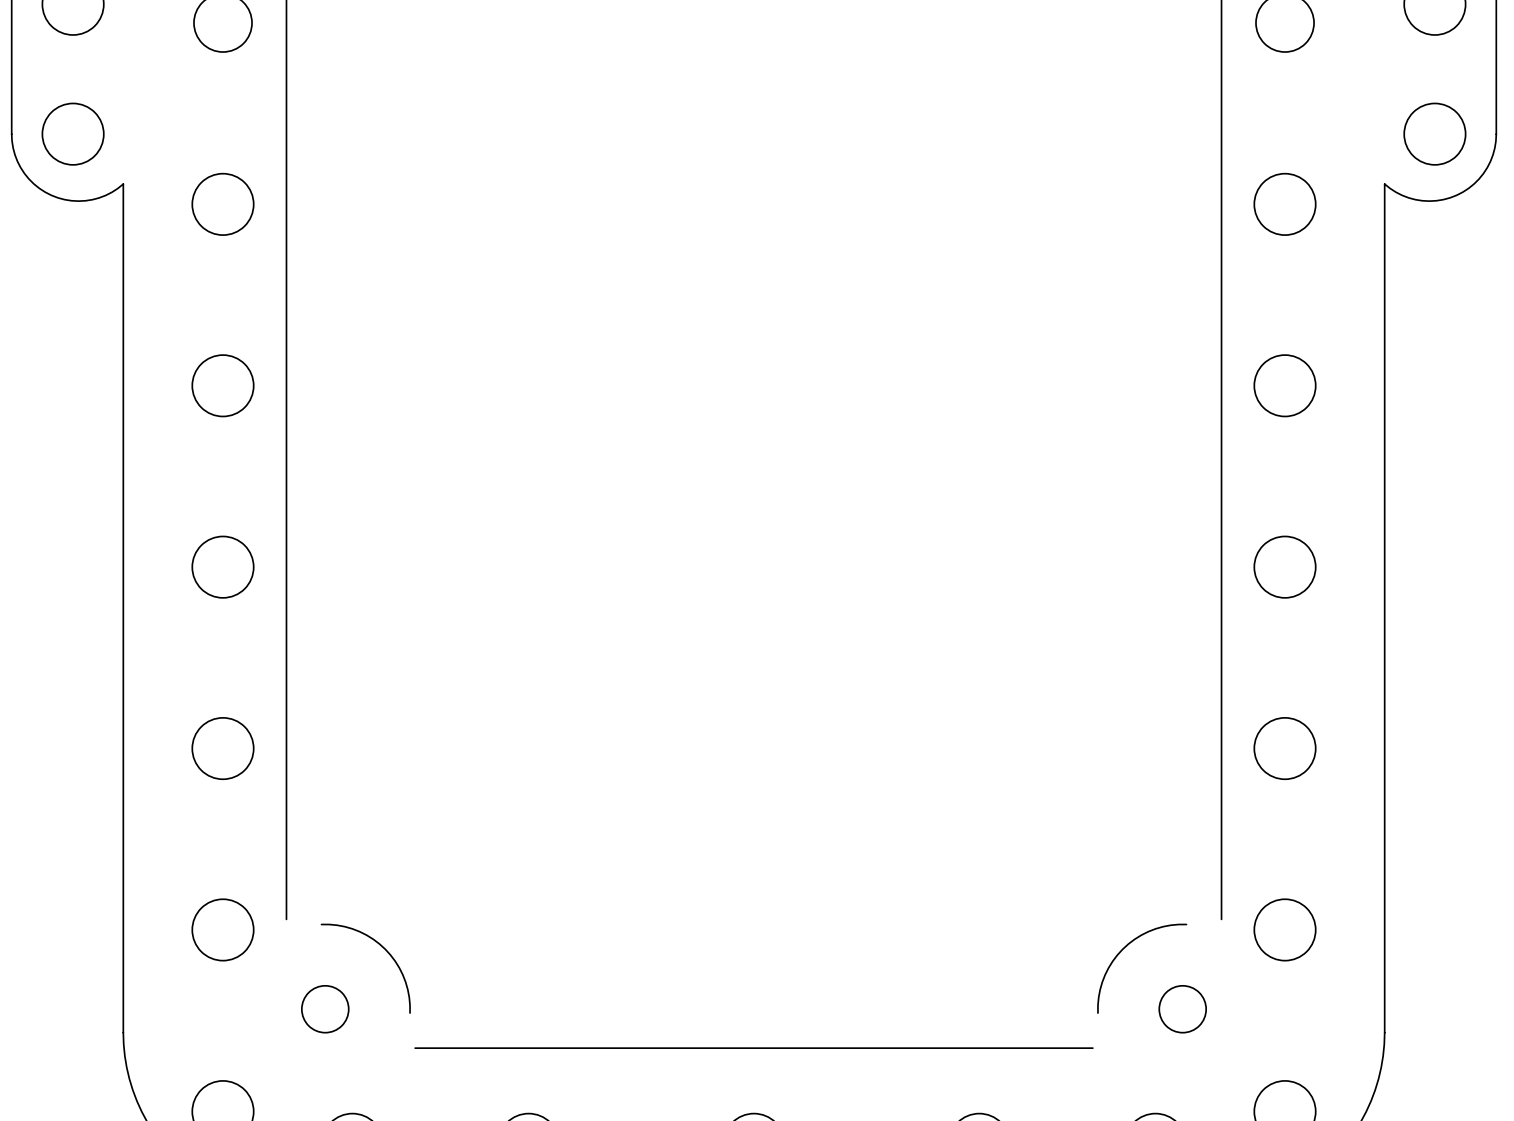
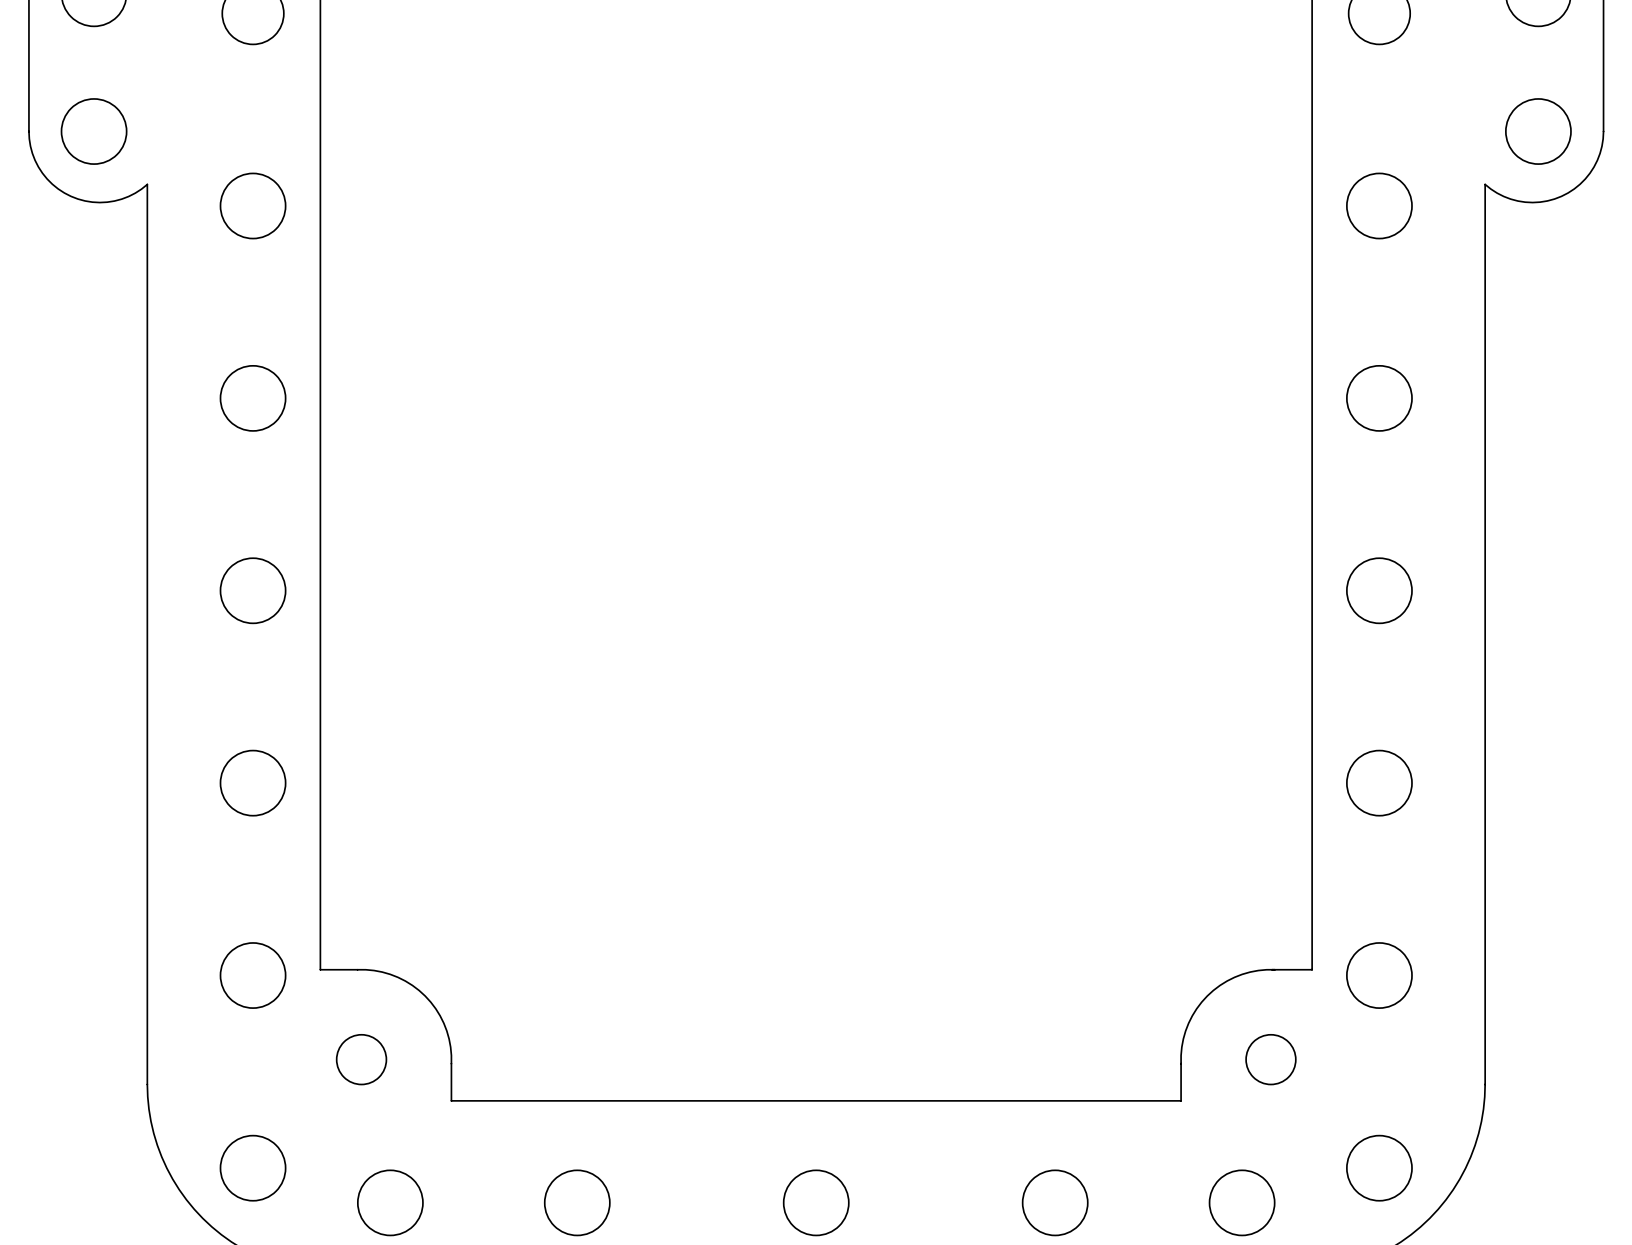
board edge: none -> (320, 964) (320, 969) (357, 969)
board edge: none -> (1312, 964) (1312, 969) (1272, 969)
board edge: none -> (451, 1063) (451, 1100) (456, 1100)
board edge: none -> (1181, 1063) (1181, 1100) (1175, 1100)

